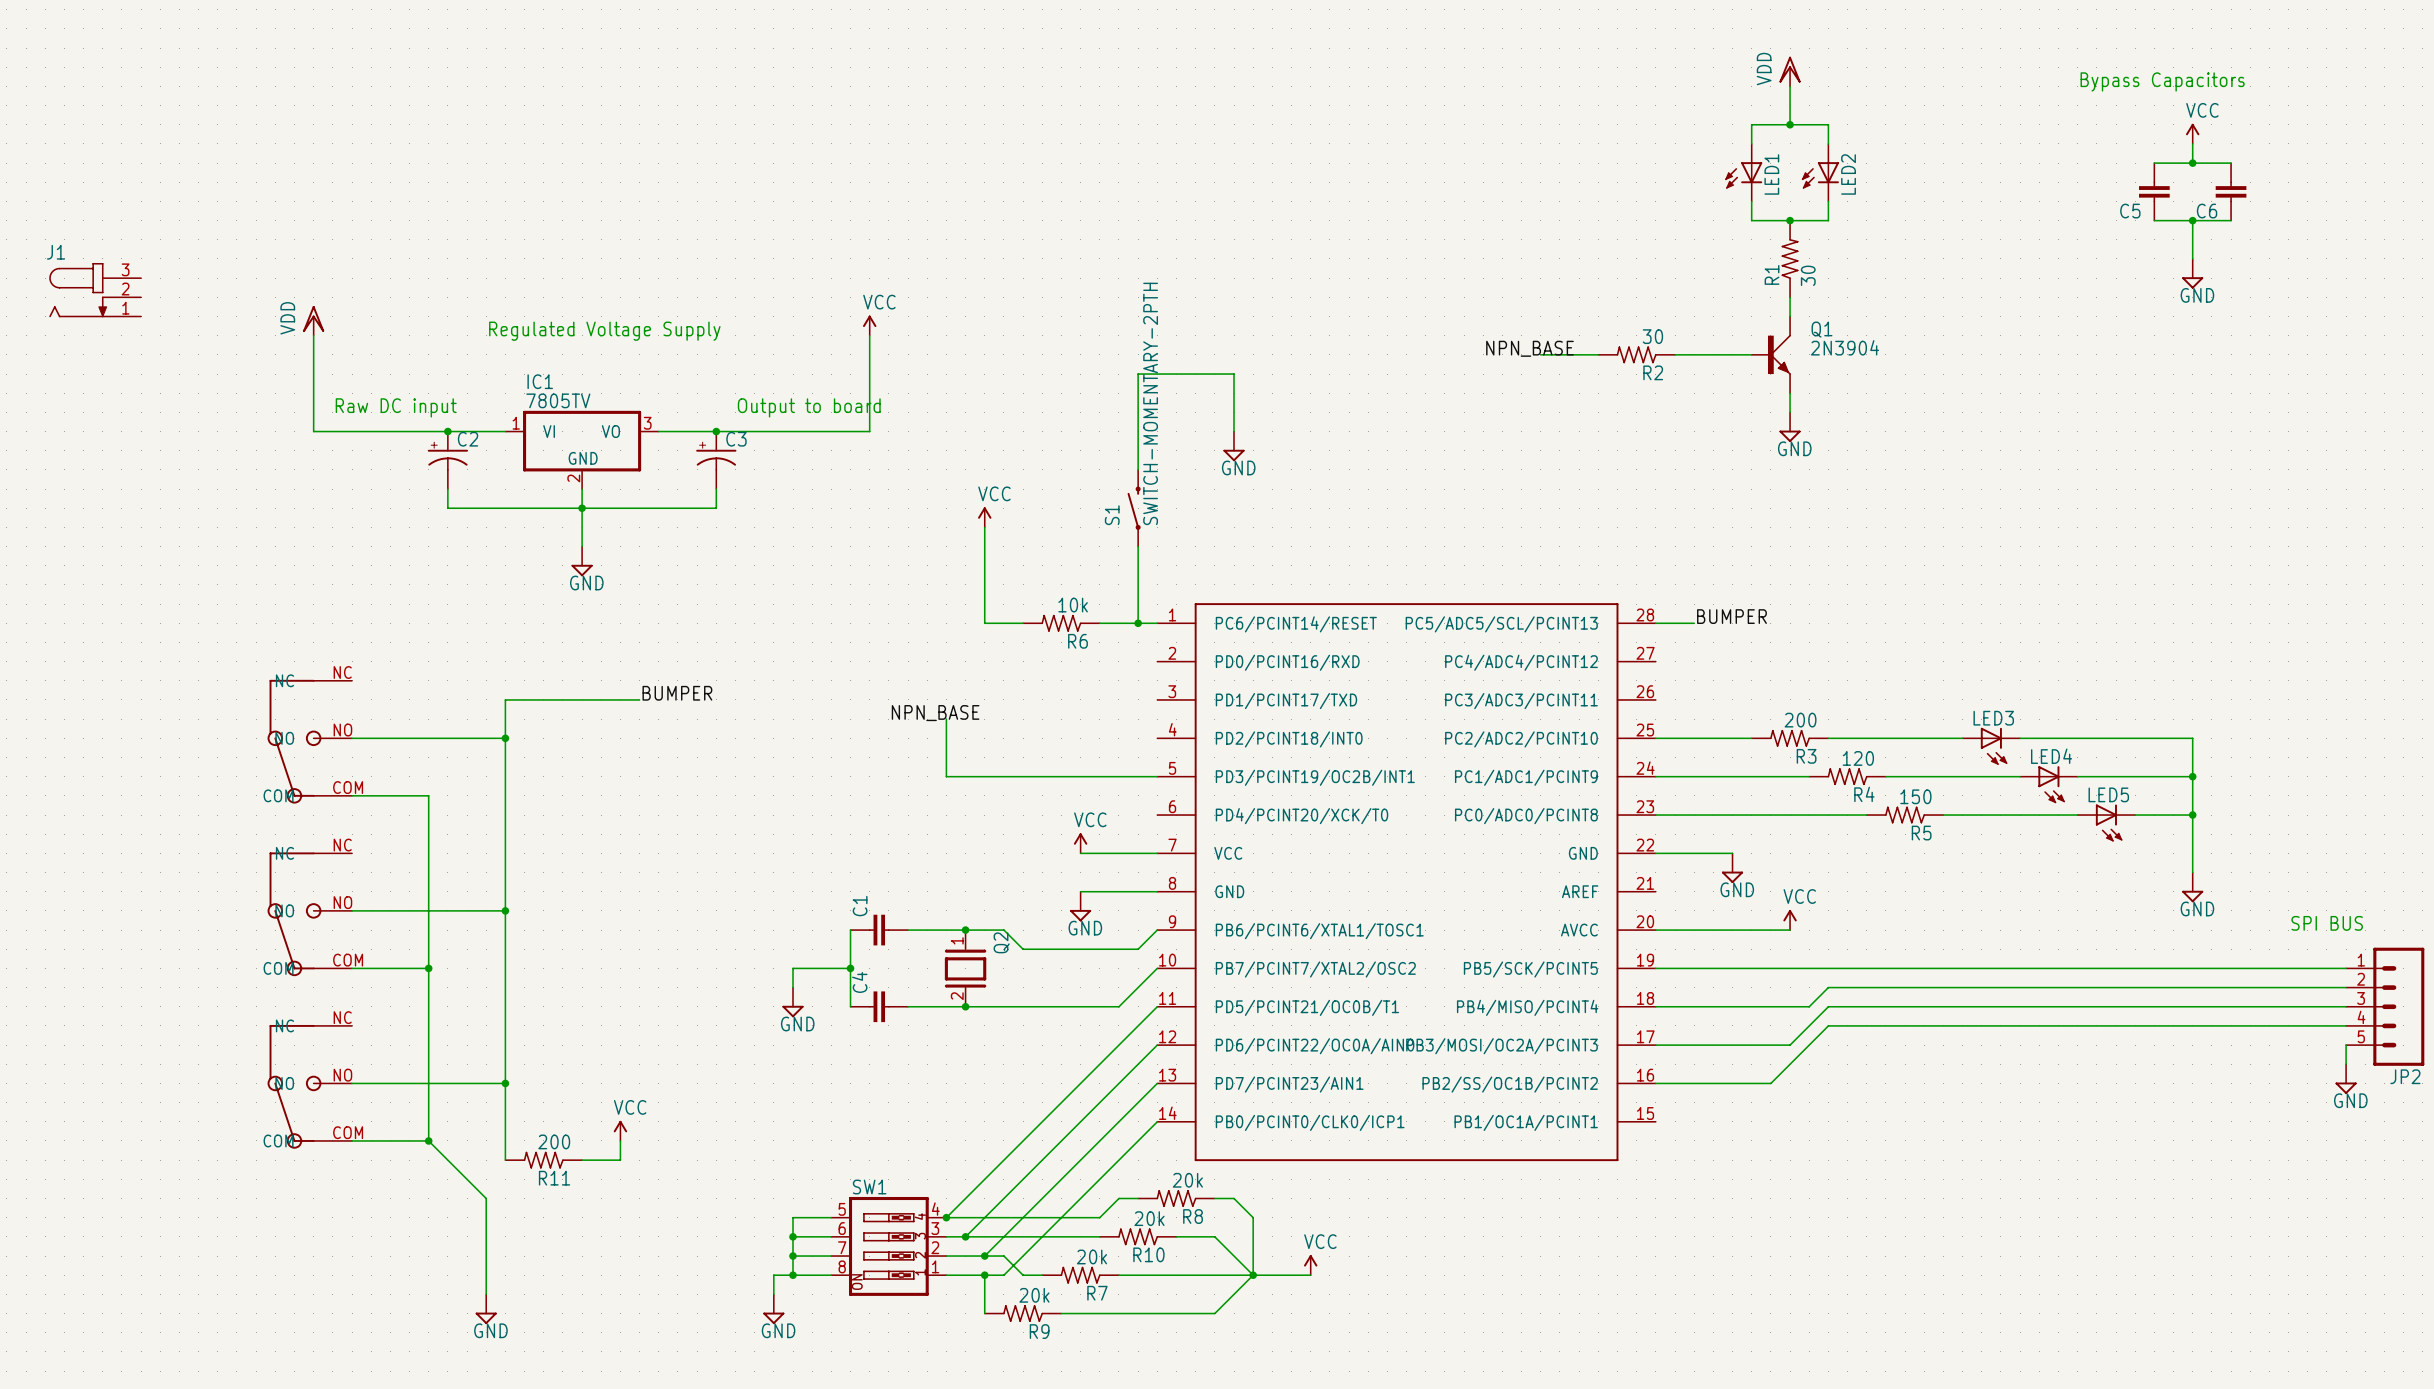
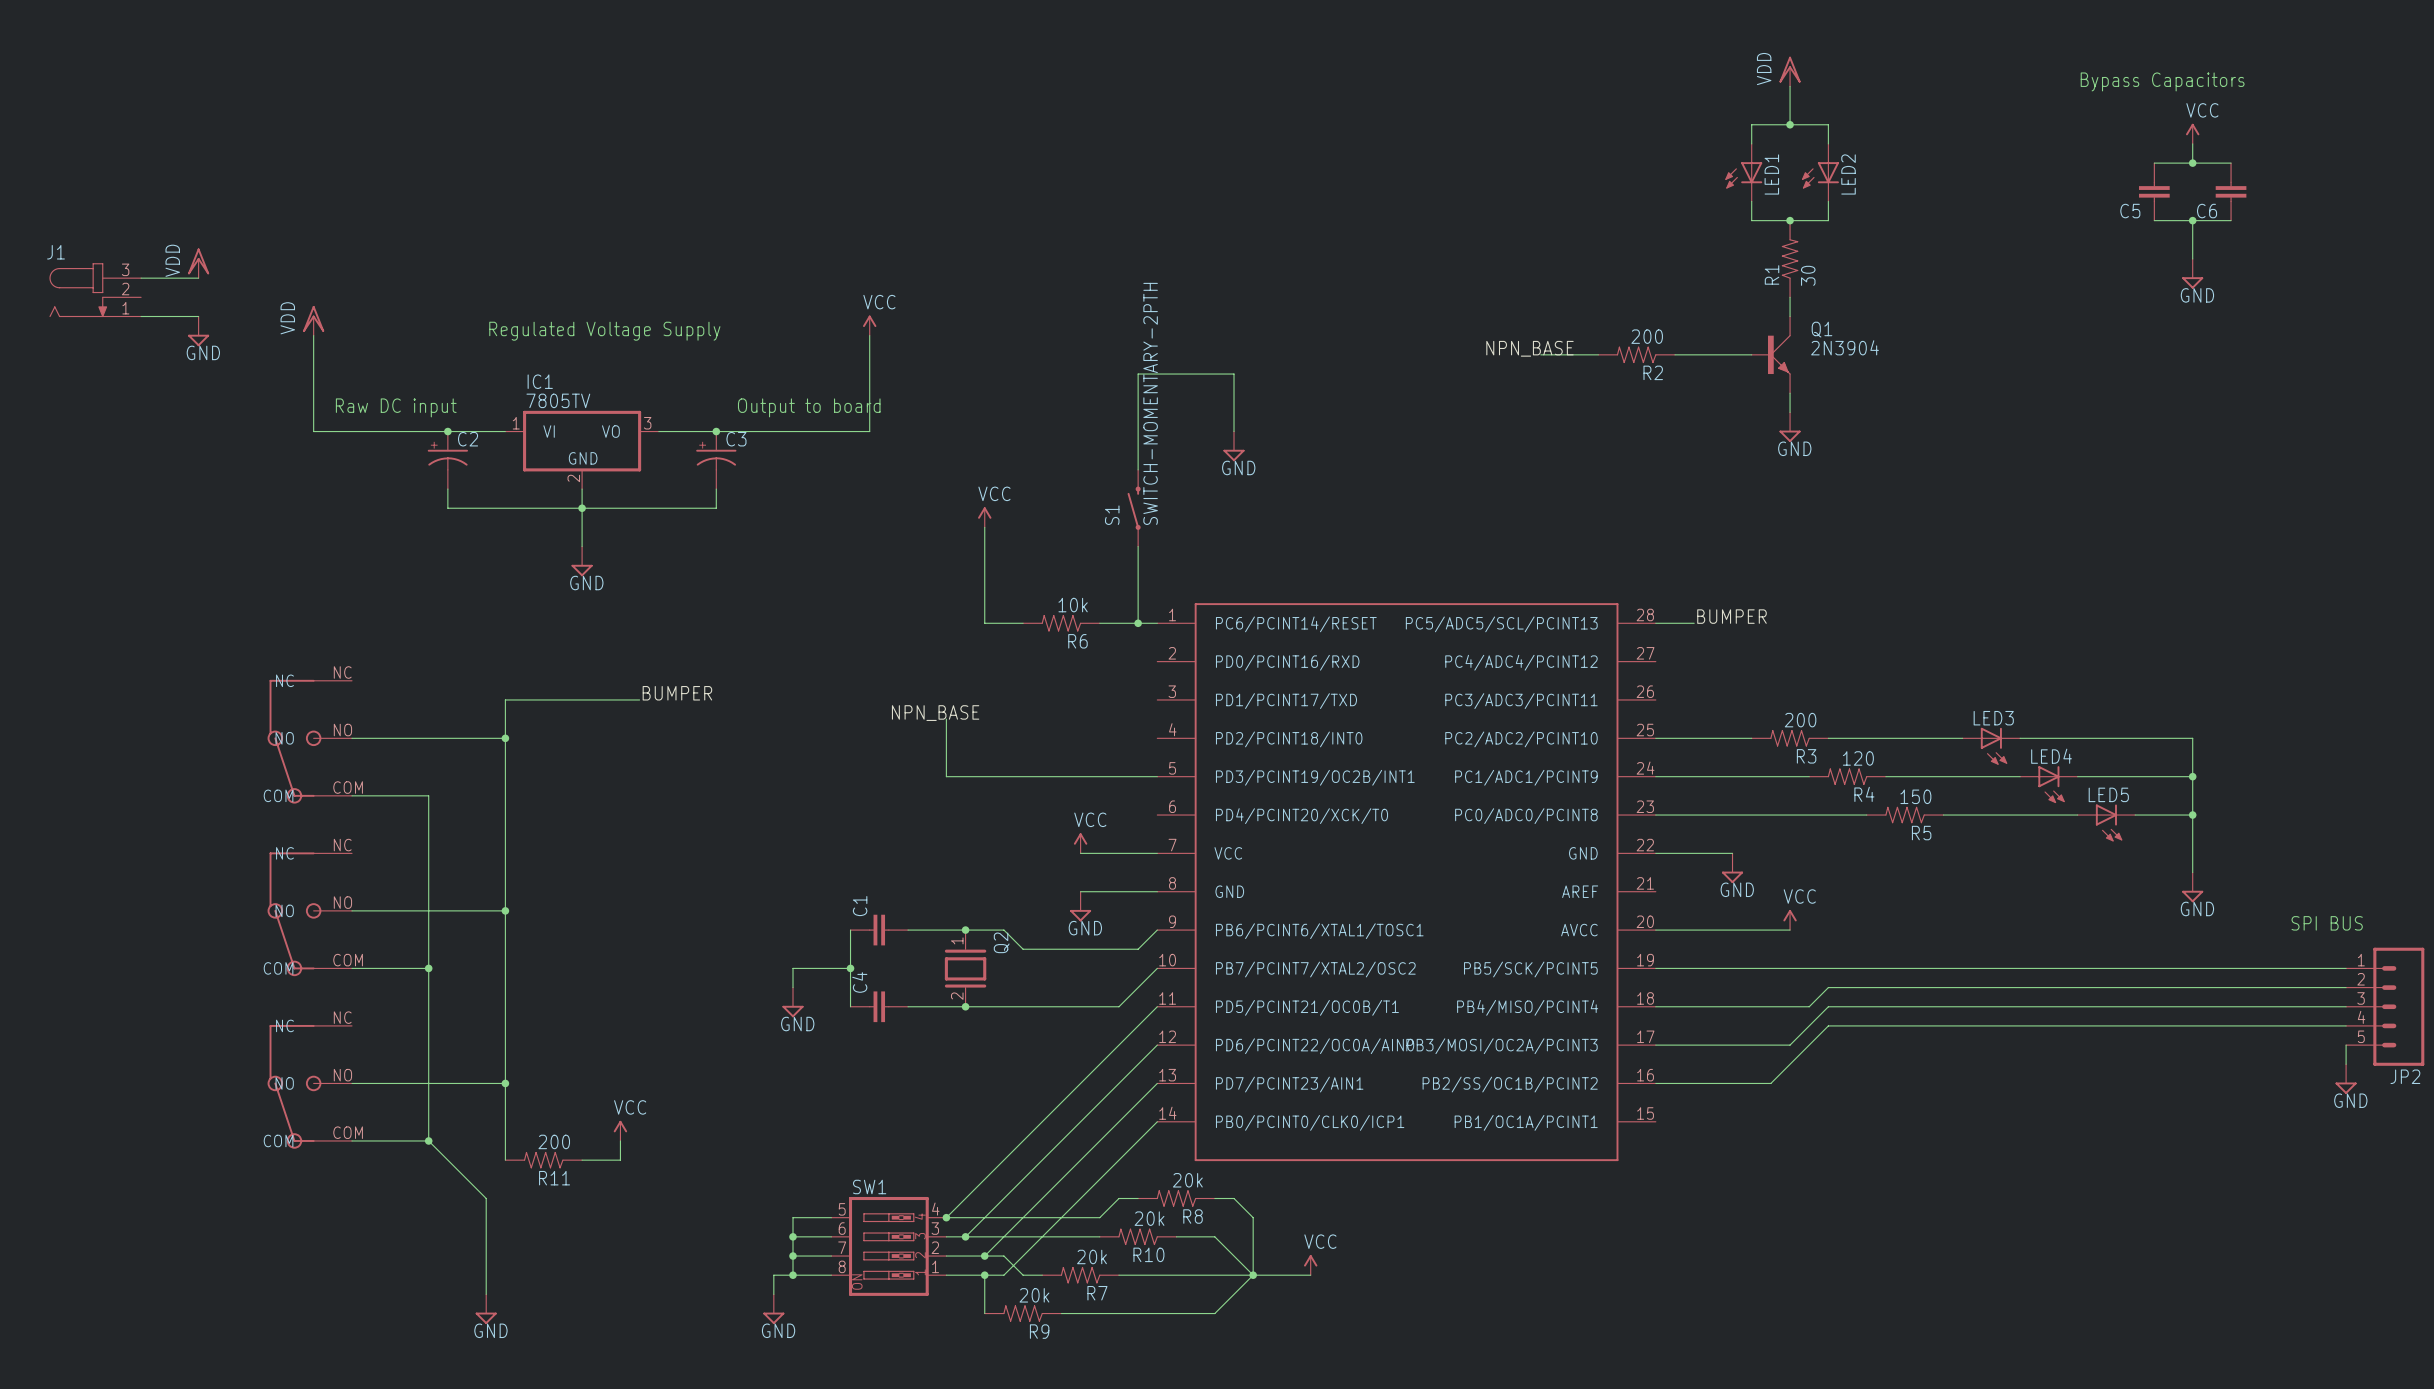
power symbol: none -> VDD (198, 263)
wire: none -> (141, 278) (198, 278)
wire: none -> (141, 316) (198, 316)
power symbol: none -> GND (198, 331)
R2 value: 30 (1652, 336) -> 200 (1647, 336)

